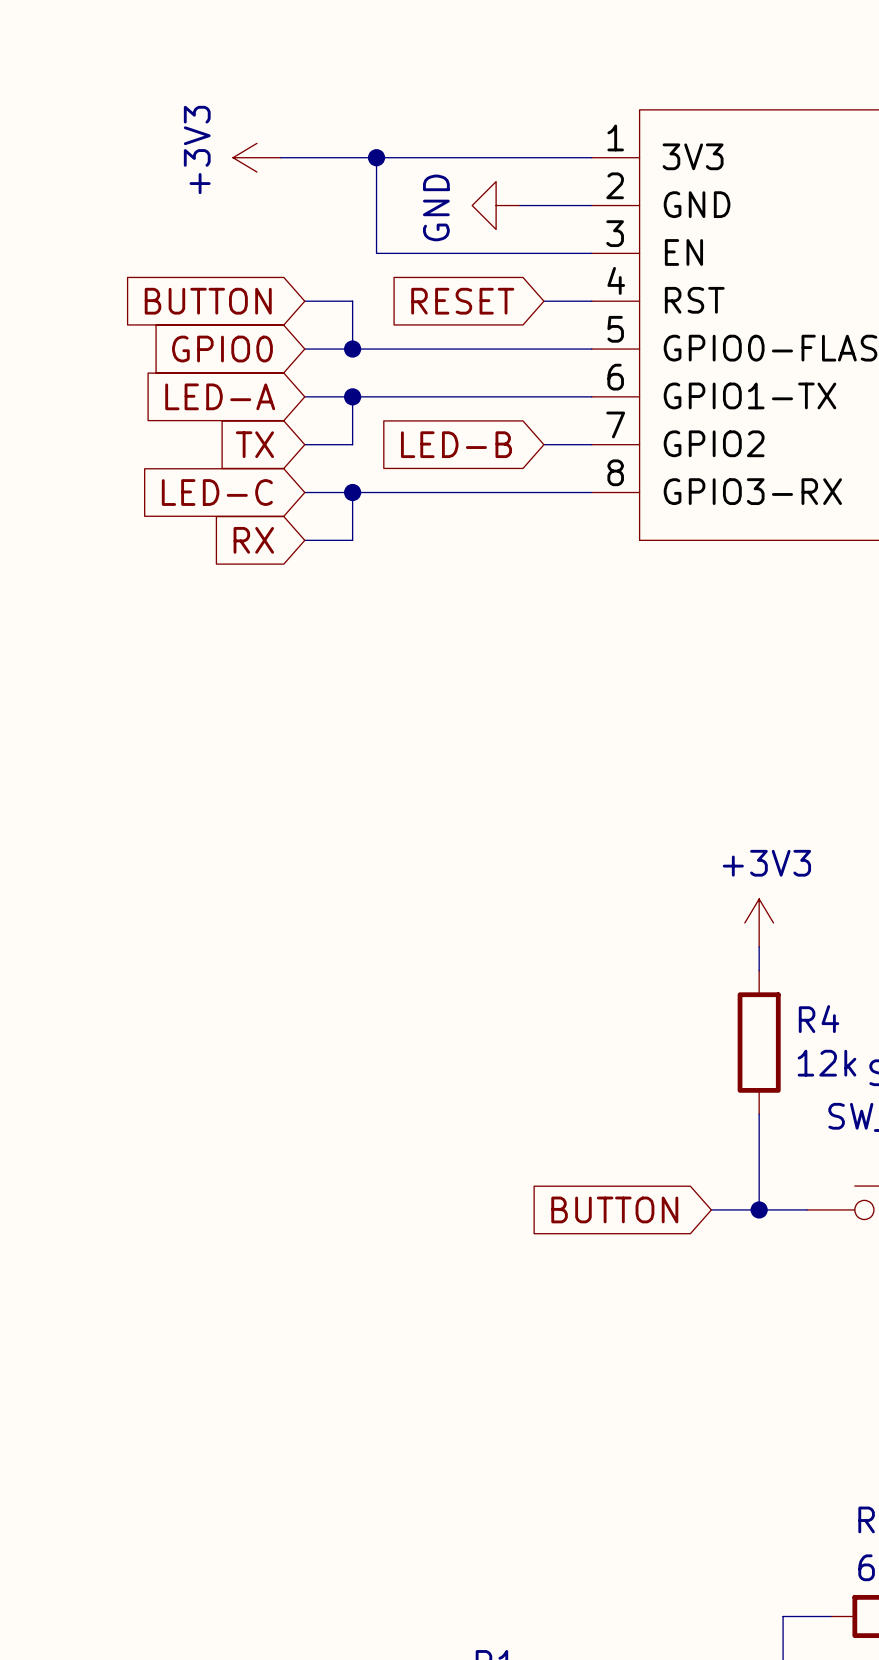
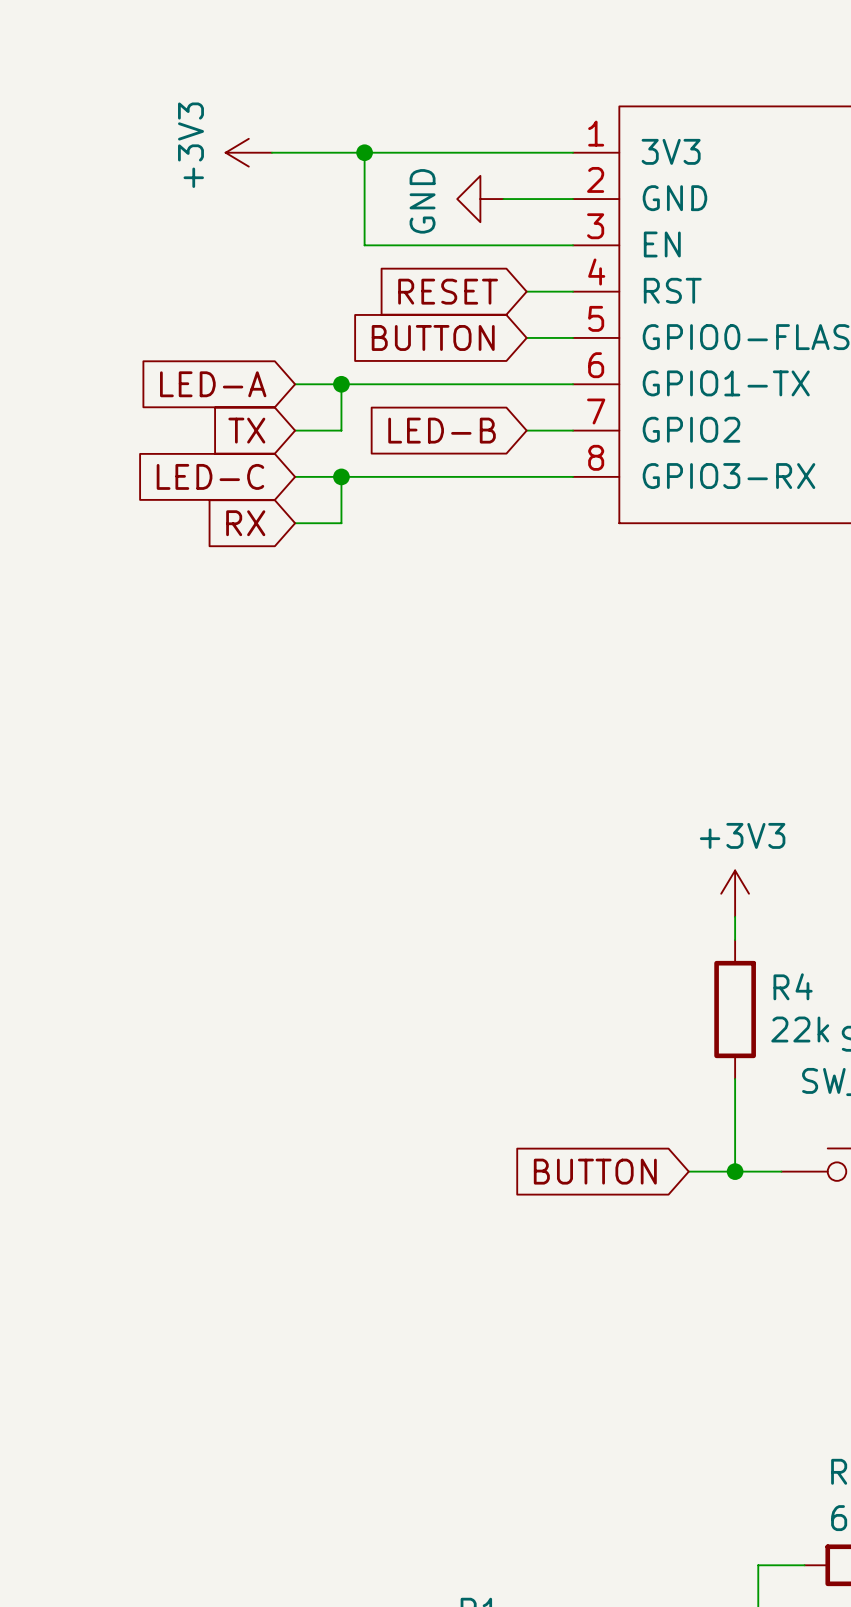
global label position: BUTTON (208, 301) -> BUTTON (433, 337)
wire: (304, 301) (352, 301) (352, 349) -> none
global label: GPIO0 (222, 349) -> none
wire: (304, 349) (543, 349) -> none
junction: (352, 349) -> none
R4 value: 12k (826, 1063) -> 22k (800, 1029)

